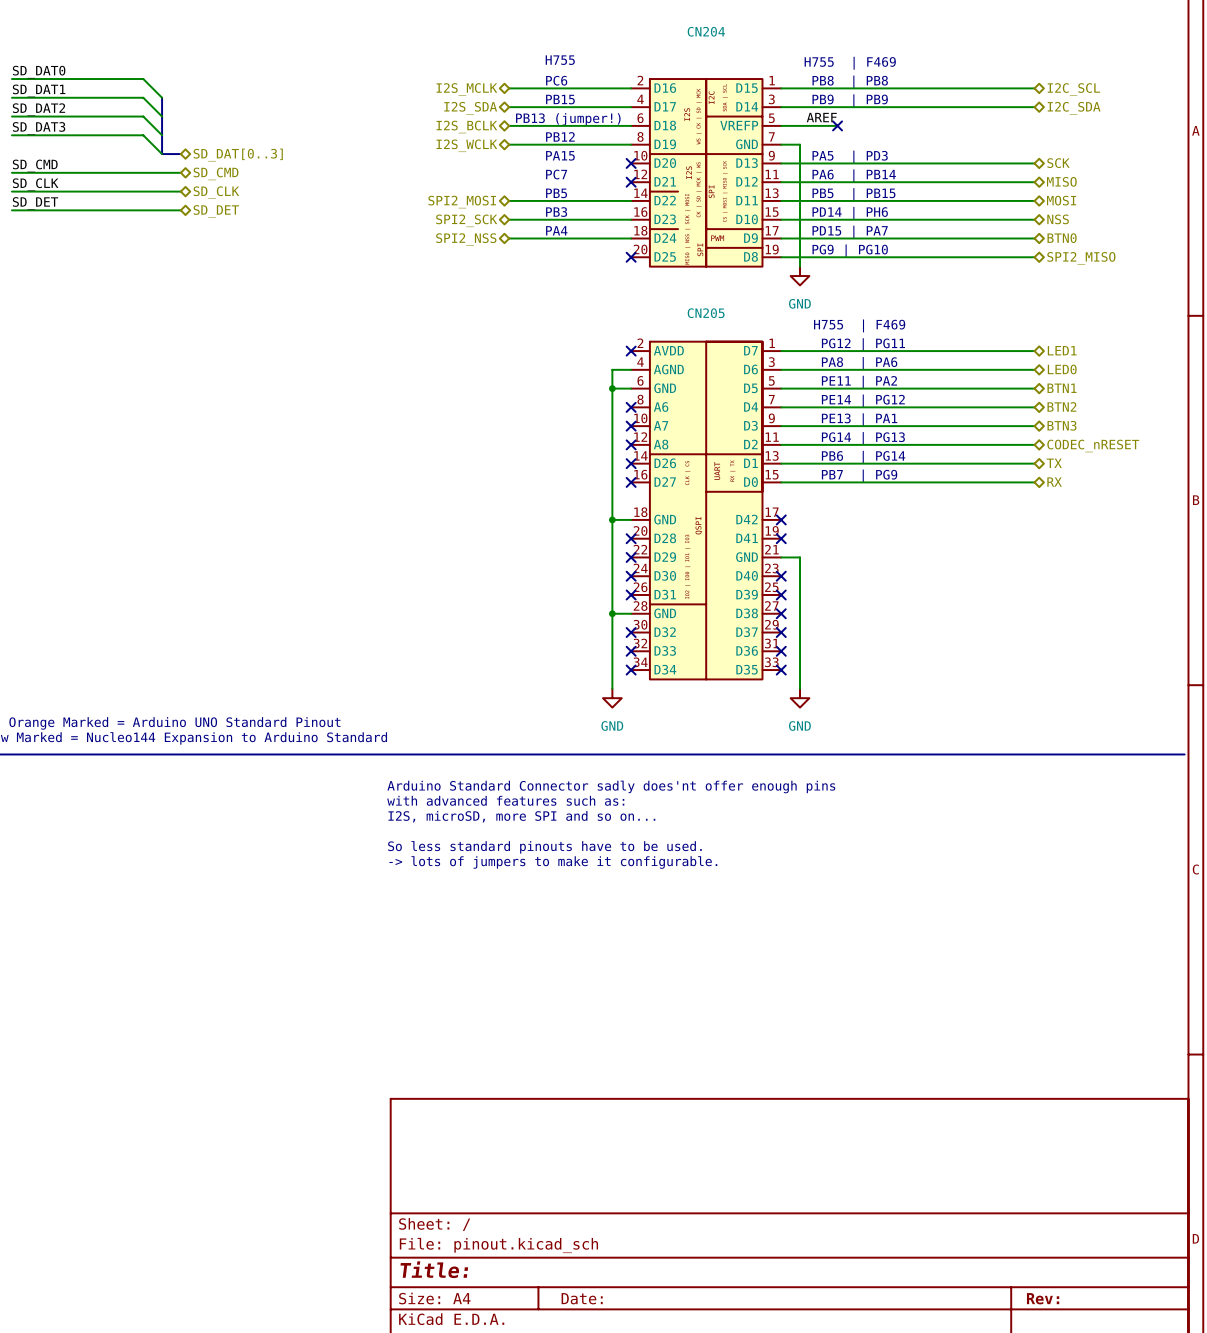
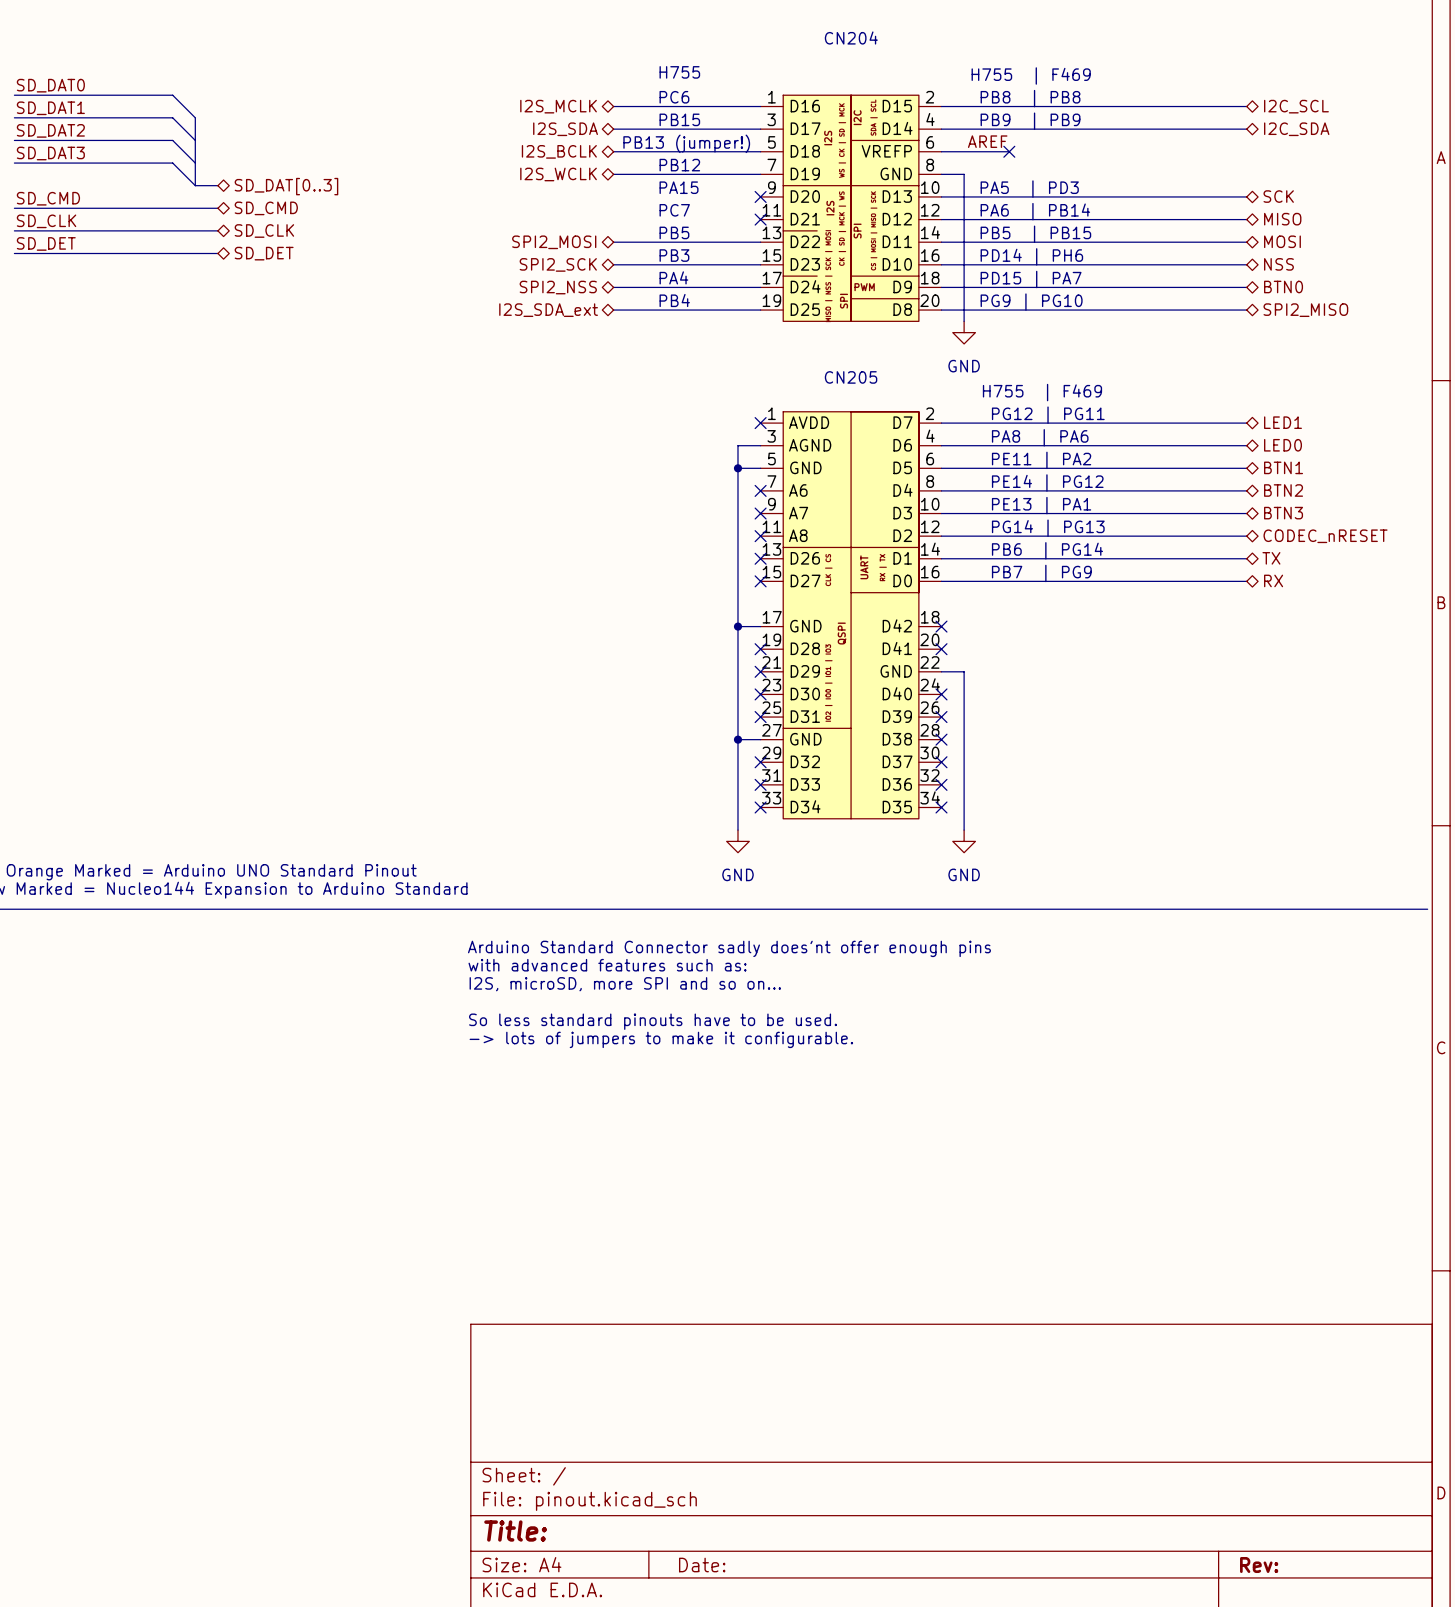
CN204 symbol: [631, 79, 782, 267] -> [760, 95, 942, 322]
text: none -> PB4 (674, 300)
wire: none -> (613, 310) (760, 310)
no-connect mark: (631, 257) -> none
hierarchical label: none -> I2S_SDA_ext (548, 310)
CN205 symbol: [631, 341, 782, 680] -> [760, 411, 942, 819]

